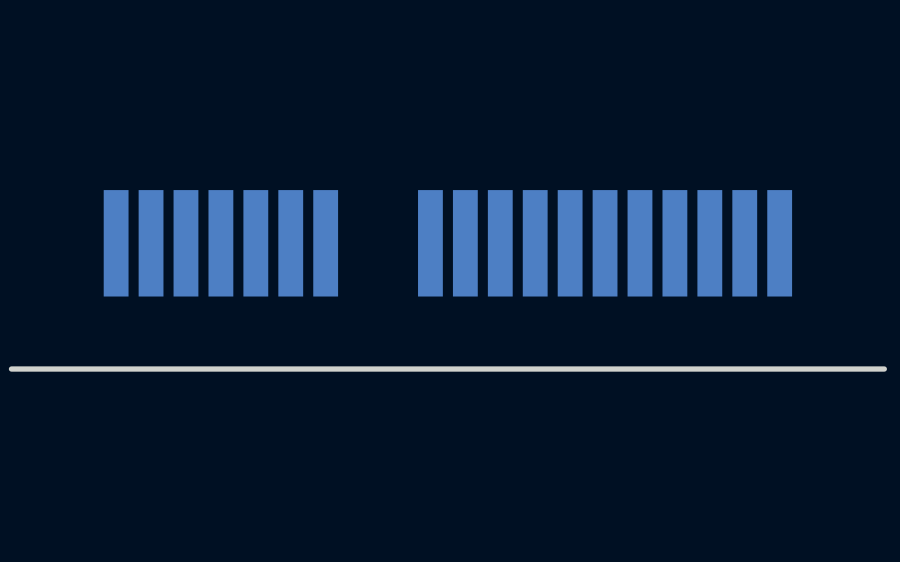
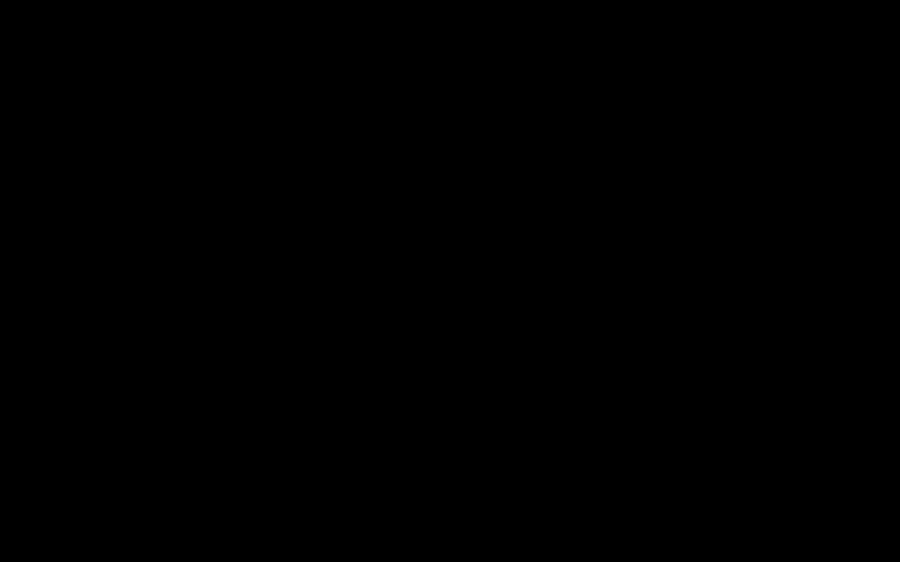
part: (447, 280) -> none

